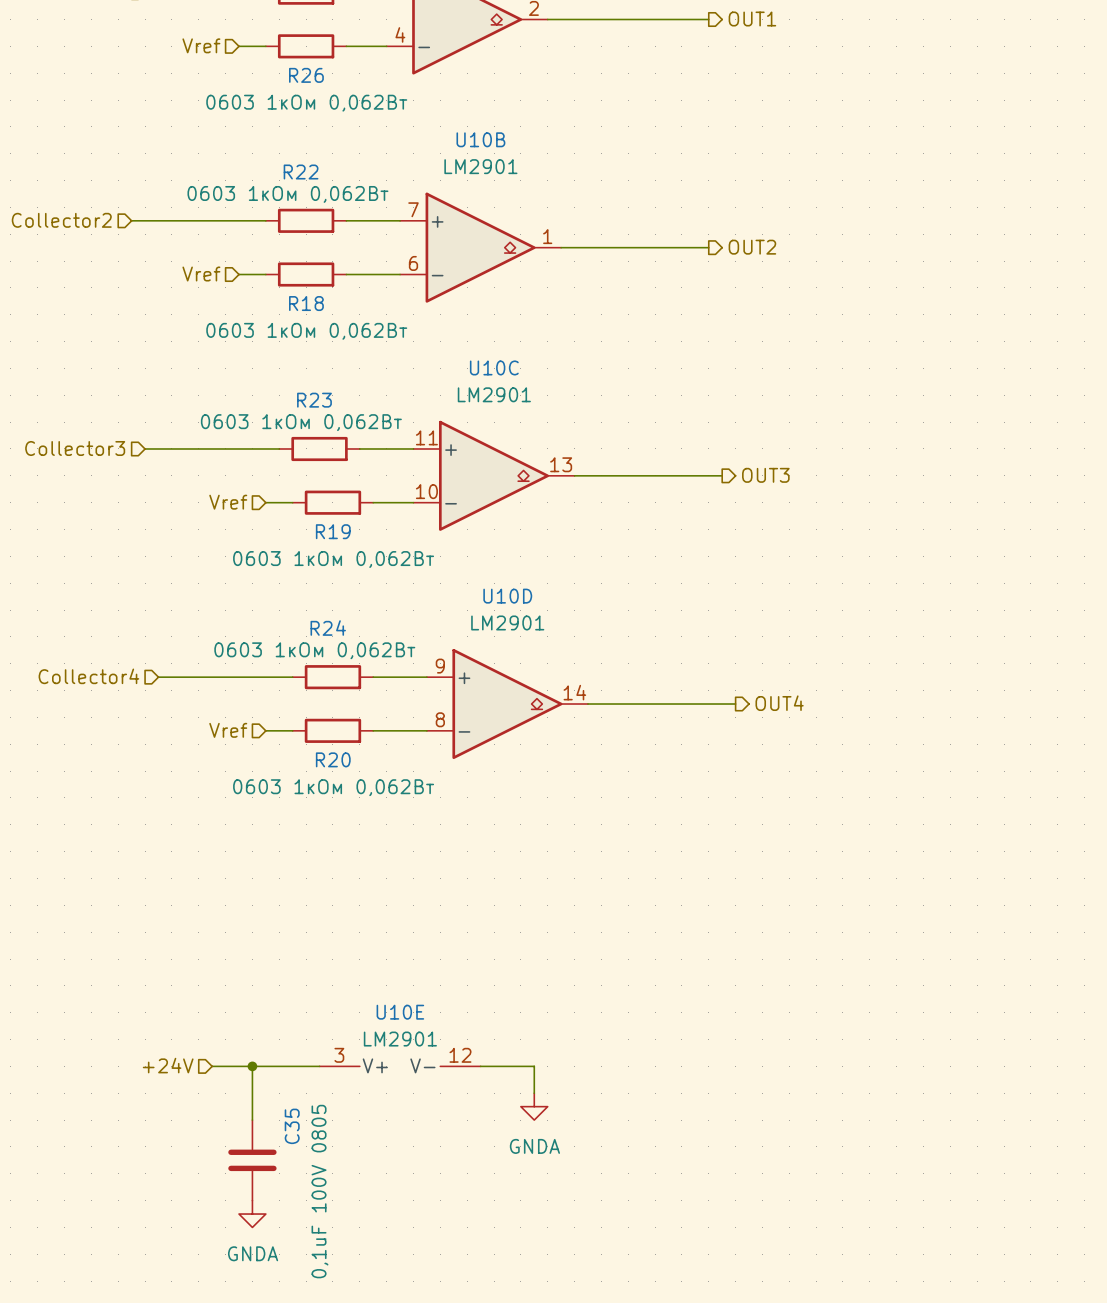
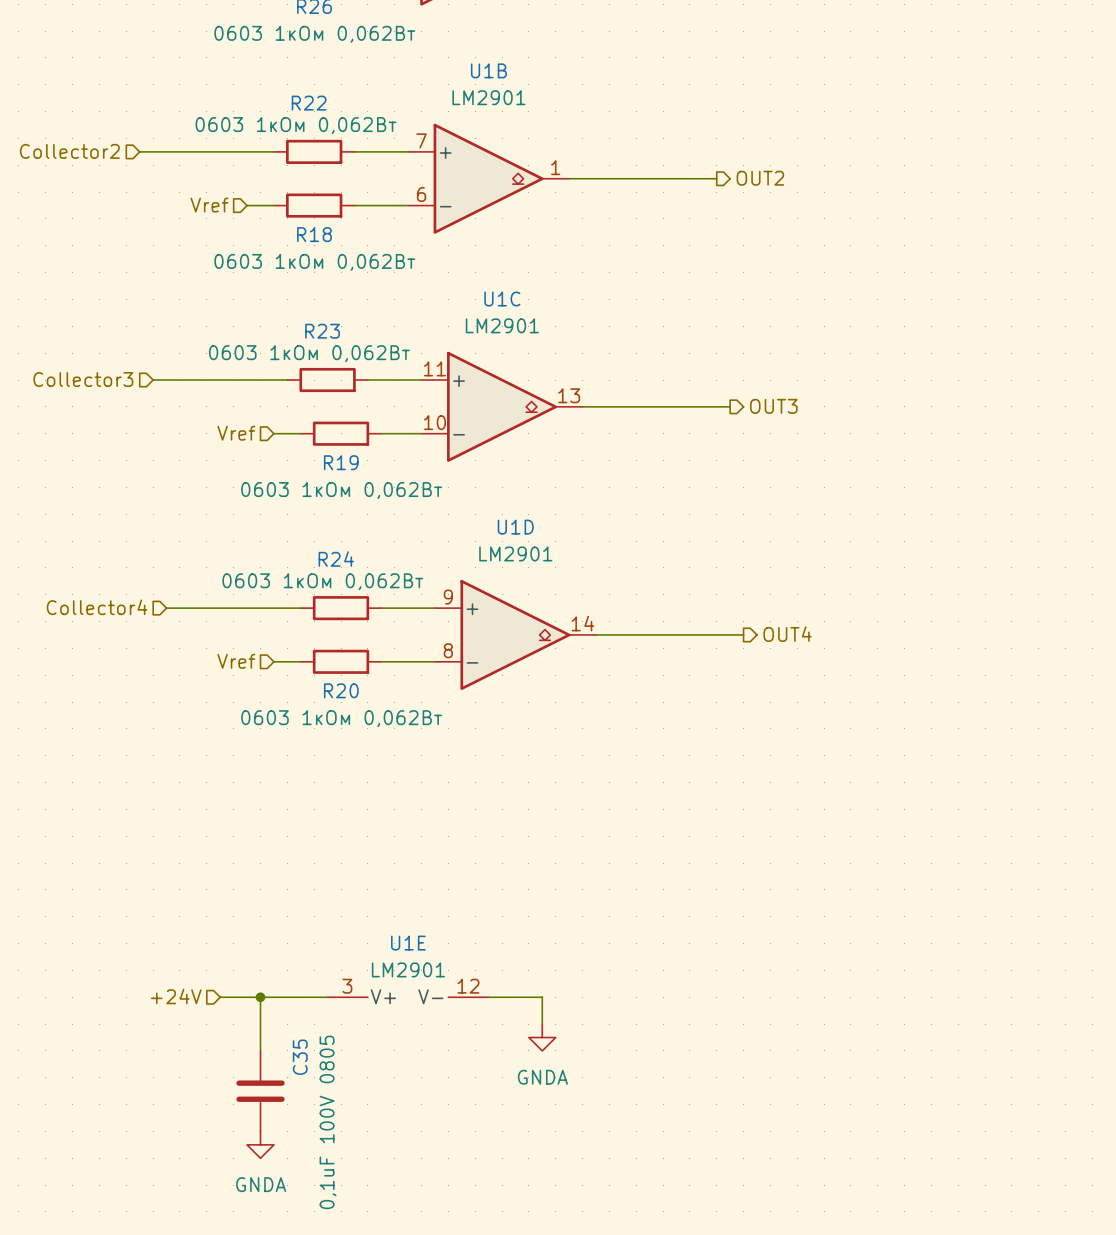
U10B name: U10B (480, 139) -> U1B (488, 70)
U10C name: U10C (494, 367) -> U1C (502, 299)
U10D name: U10D (507, 596) -> U1D (515, 527)
U10E name: U10E (400, 1012) -> U1E (408, 943)

